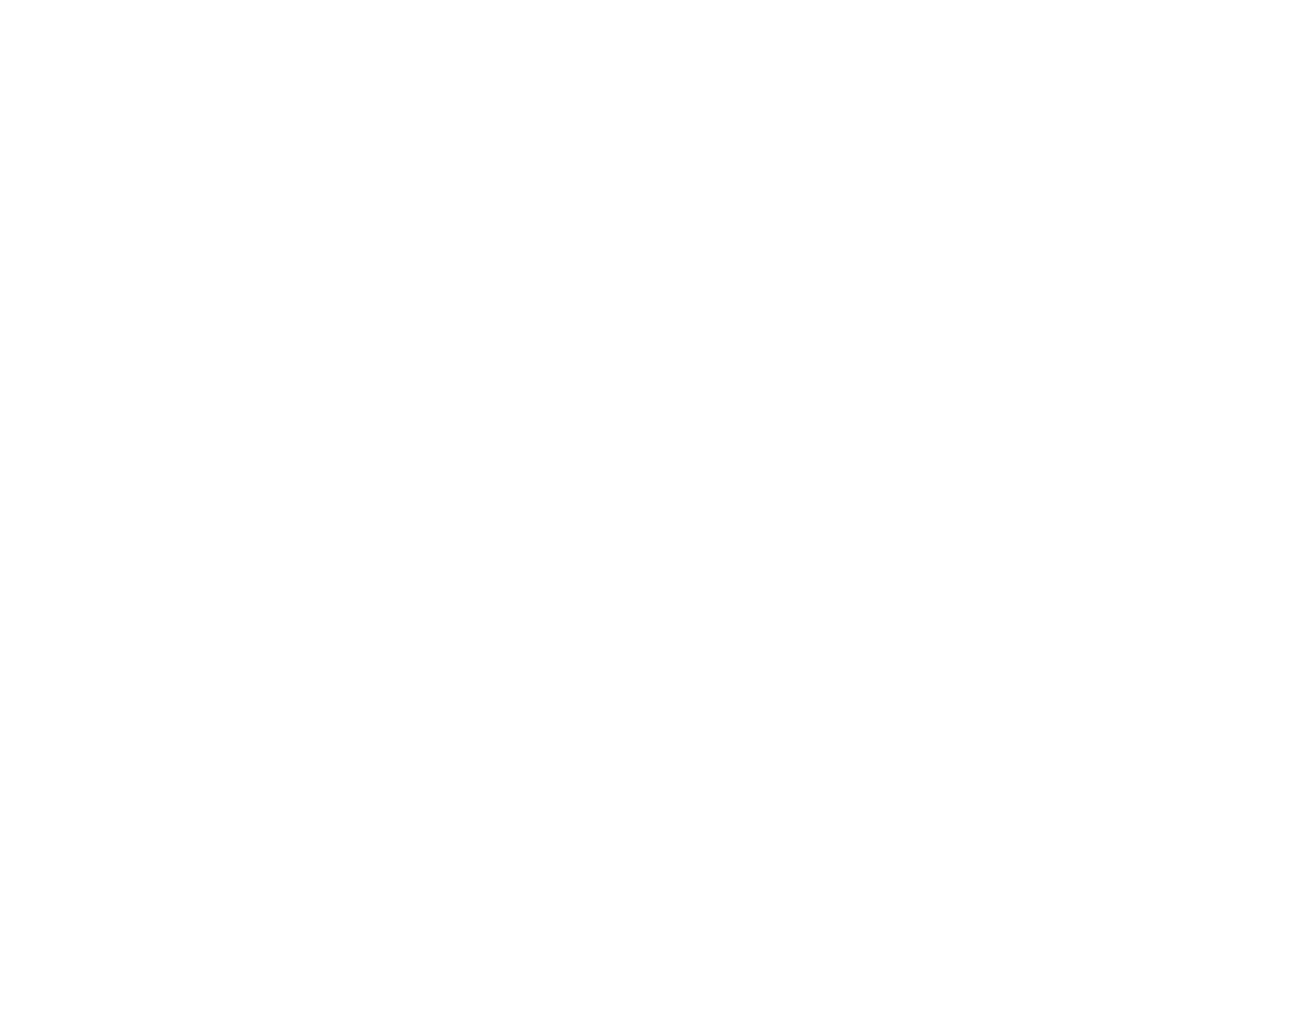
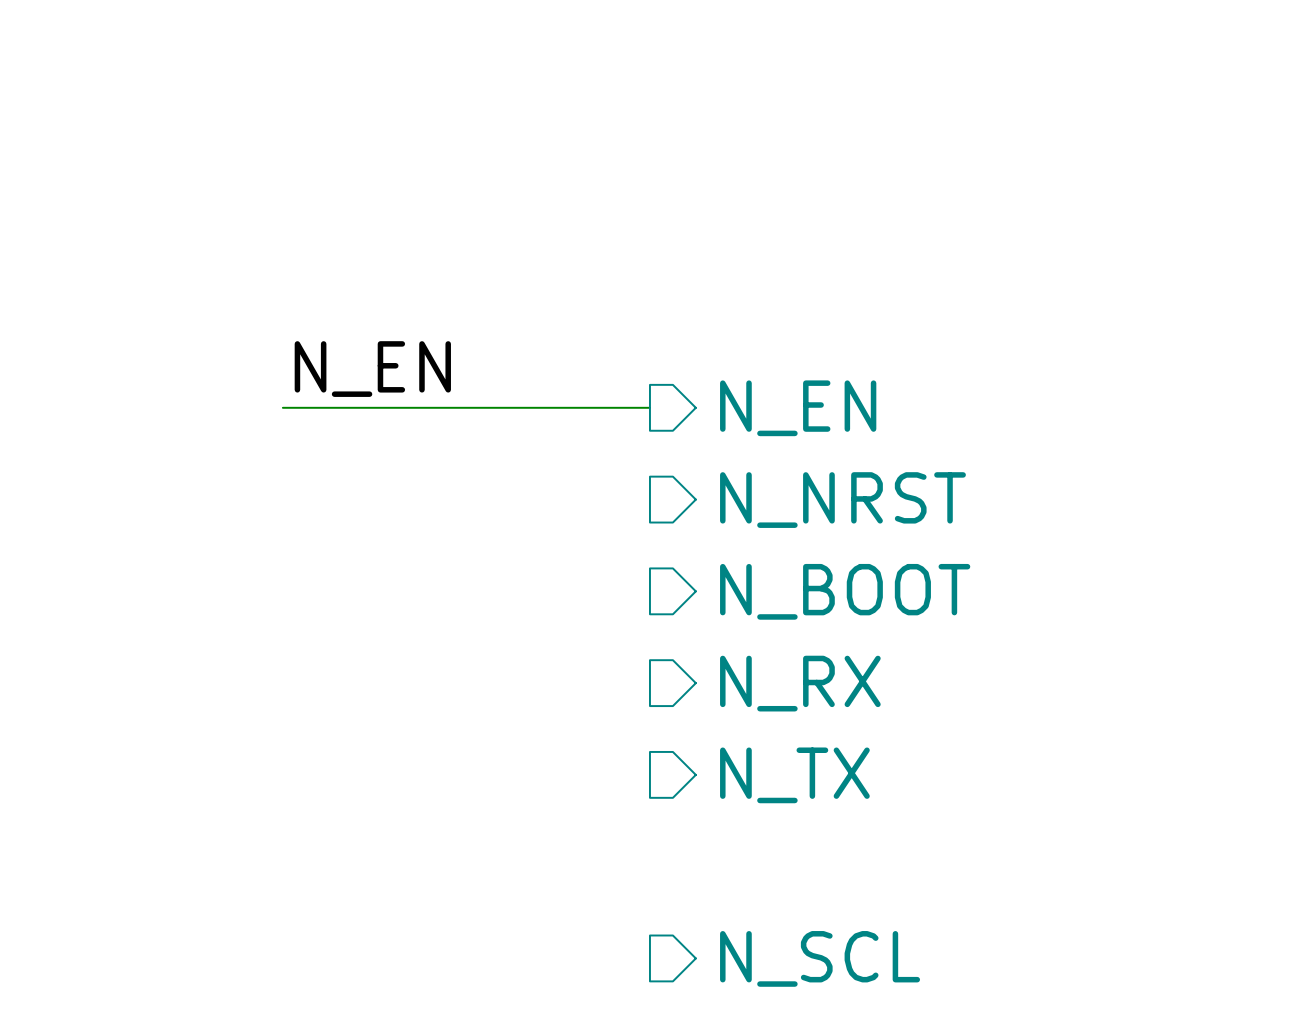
label: none -> N_EN (372, 369)
wire: none -> (282, 407) (649, 407)
sheet pin: none -> N_EN (798, 408)
sheet pin: none -> N_NRST (842, 500)
sheet pin: none -> N_BOOT (845, 591)
sheet pin: none -> N_RX (800, 683)
sheet pin: none -> N_TX (794, 775)
sheet pin: none -> N_SCL (820, 958)

